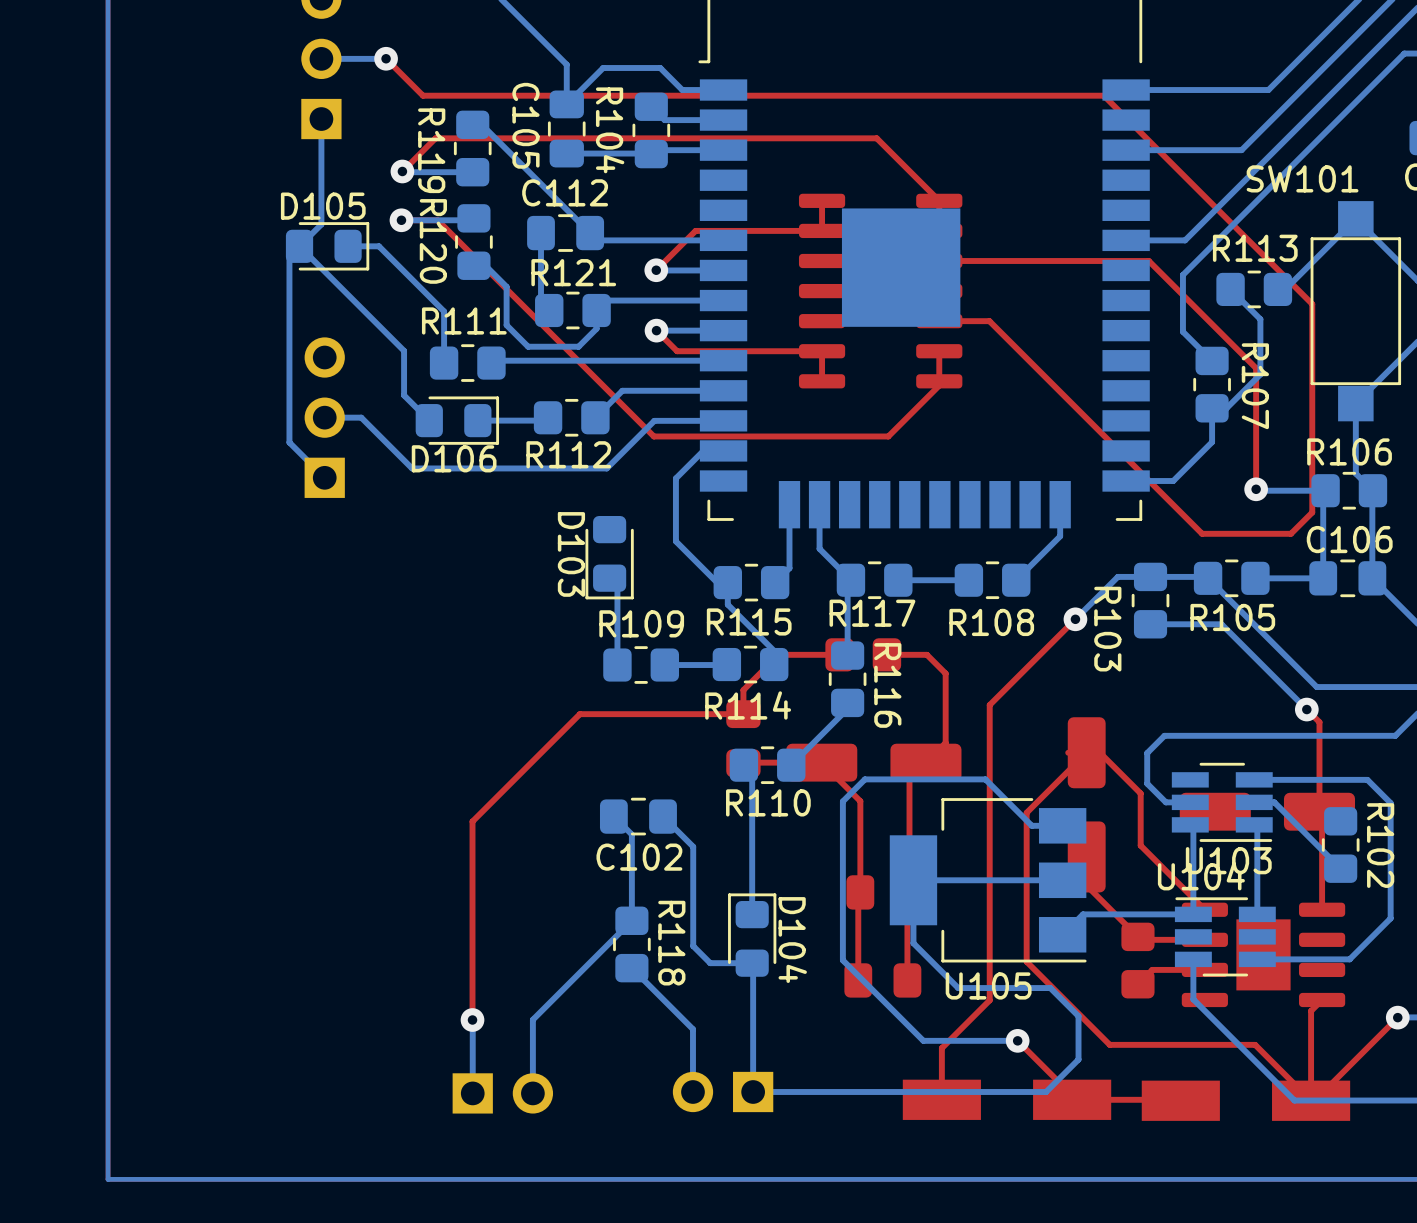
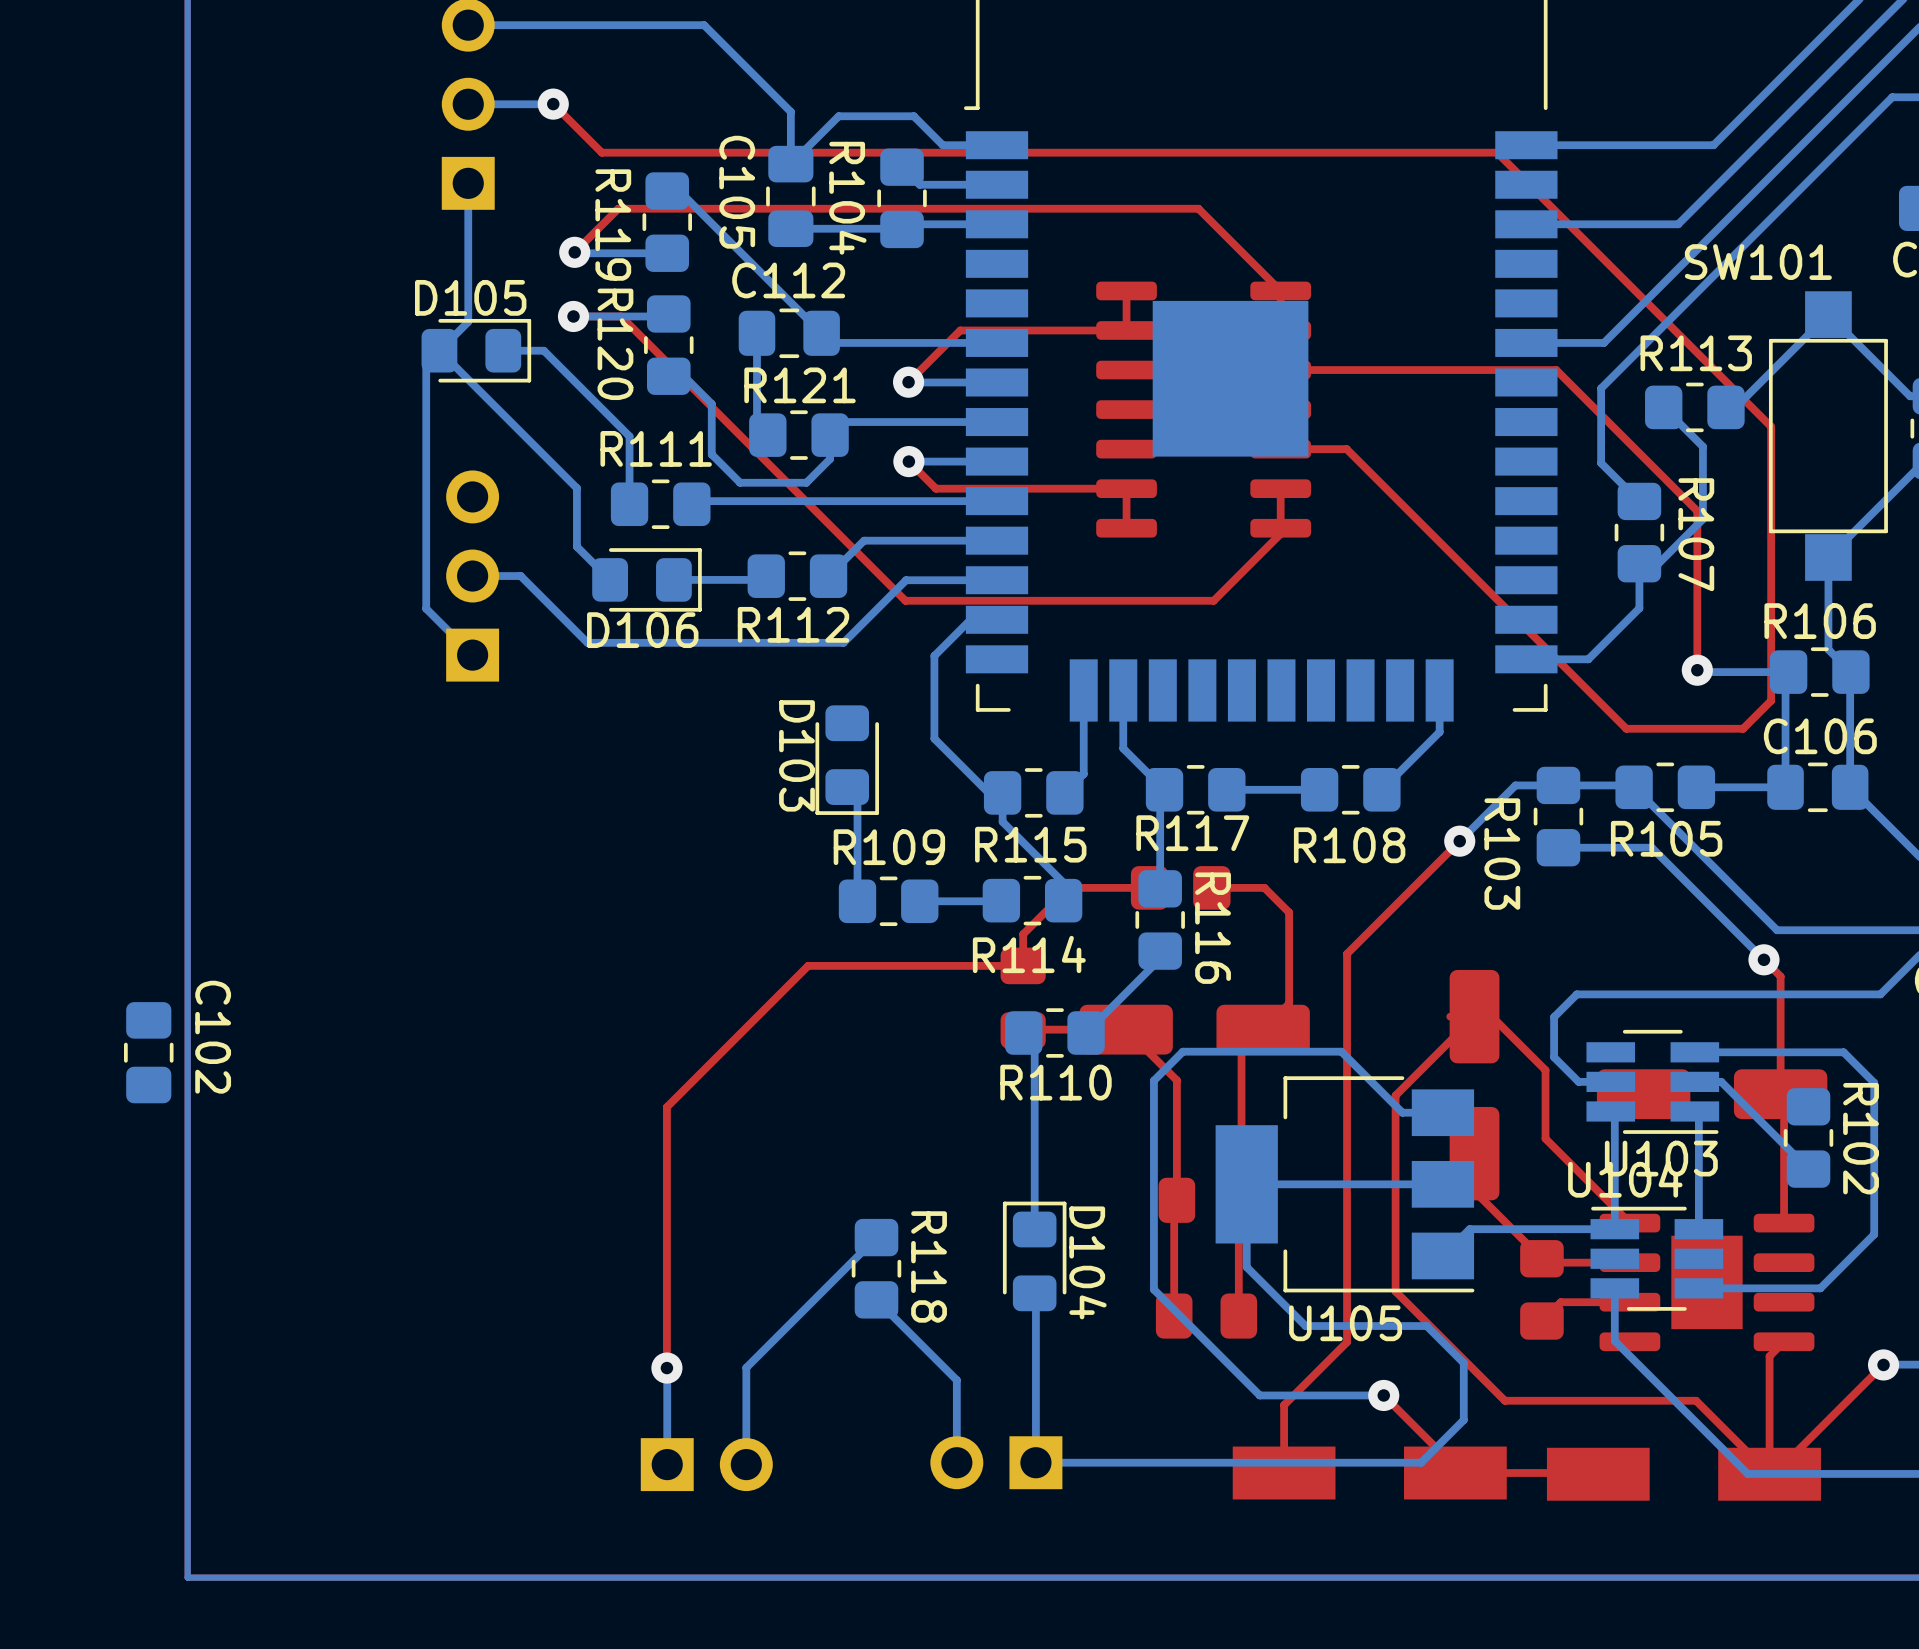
bottom track: (613, 816) (631, 834) (631, 920) -> none
C102 rotation: 0° (638, 816) -> 90° clockwise (148, 1052)
C102 position: (638, 816) -> (148, 1052)
bottom track: (663, 816) (693, 846) (693, 946) (710, 963) (752, 963) -> none
C102 name position: C102 (639, 857) -> C102 (213, 1037)

